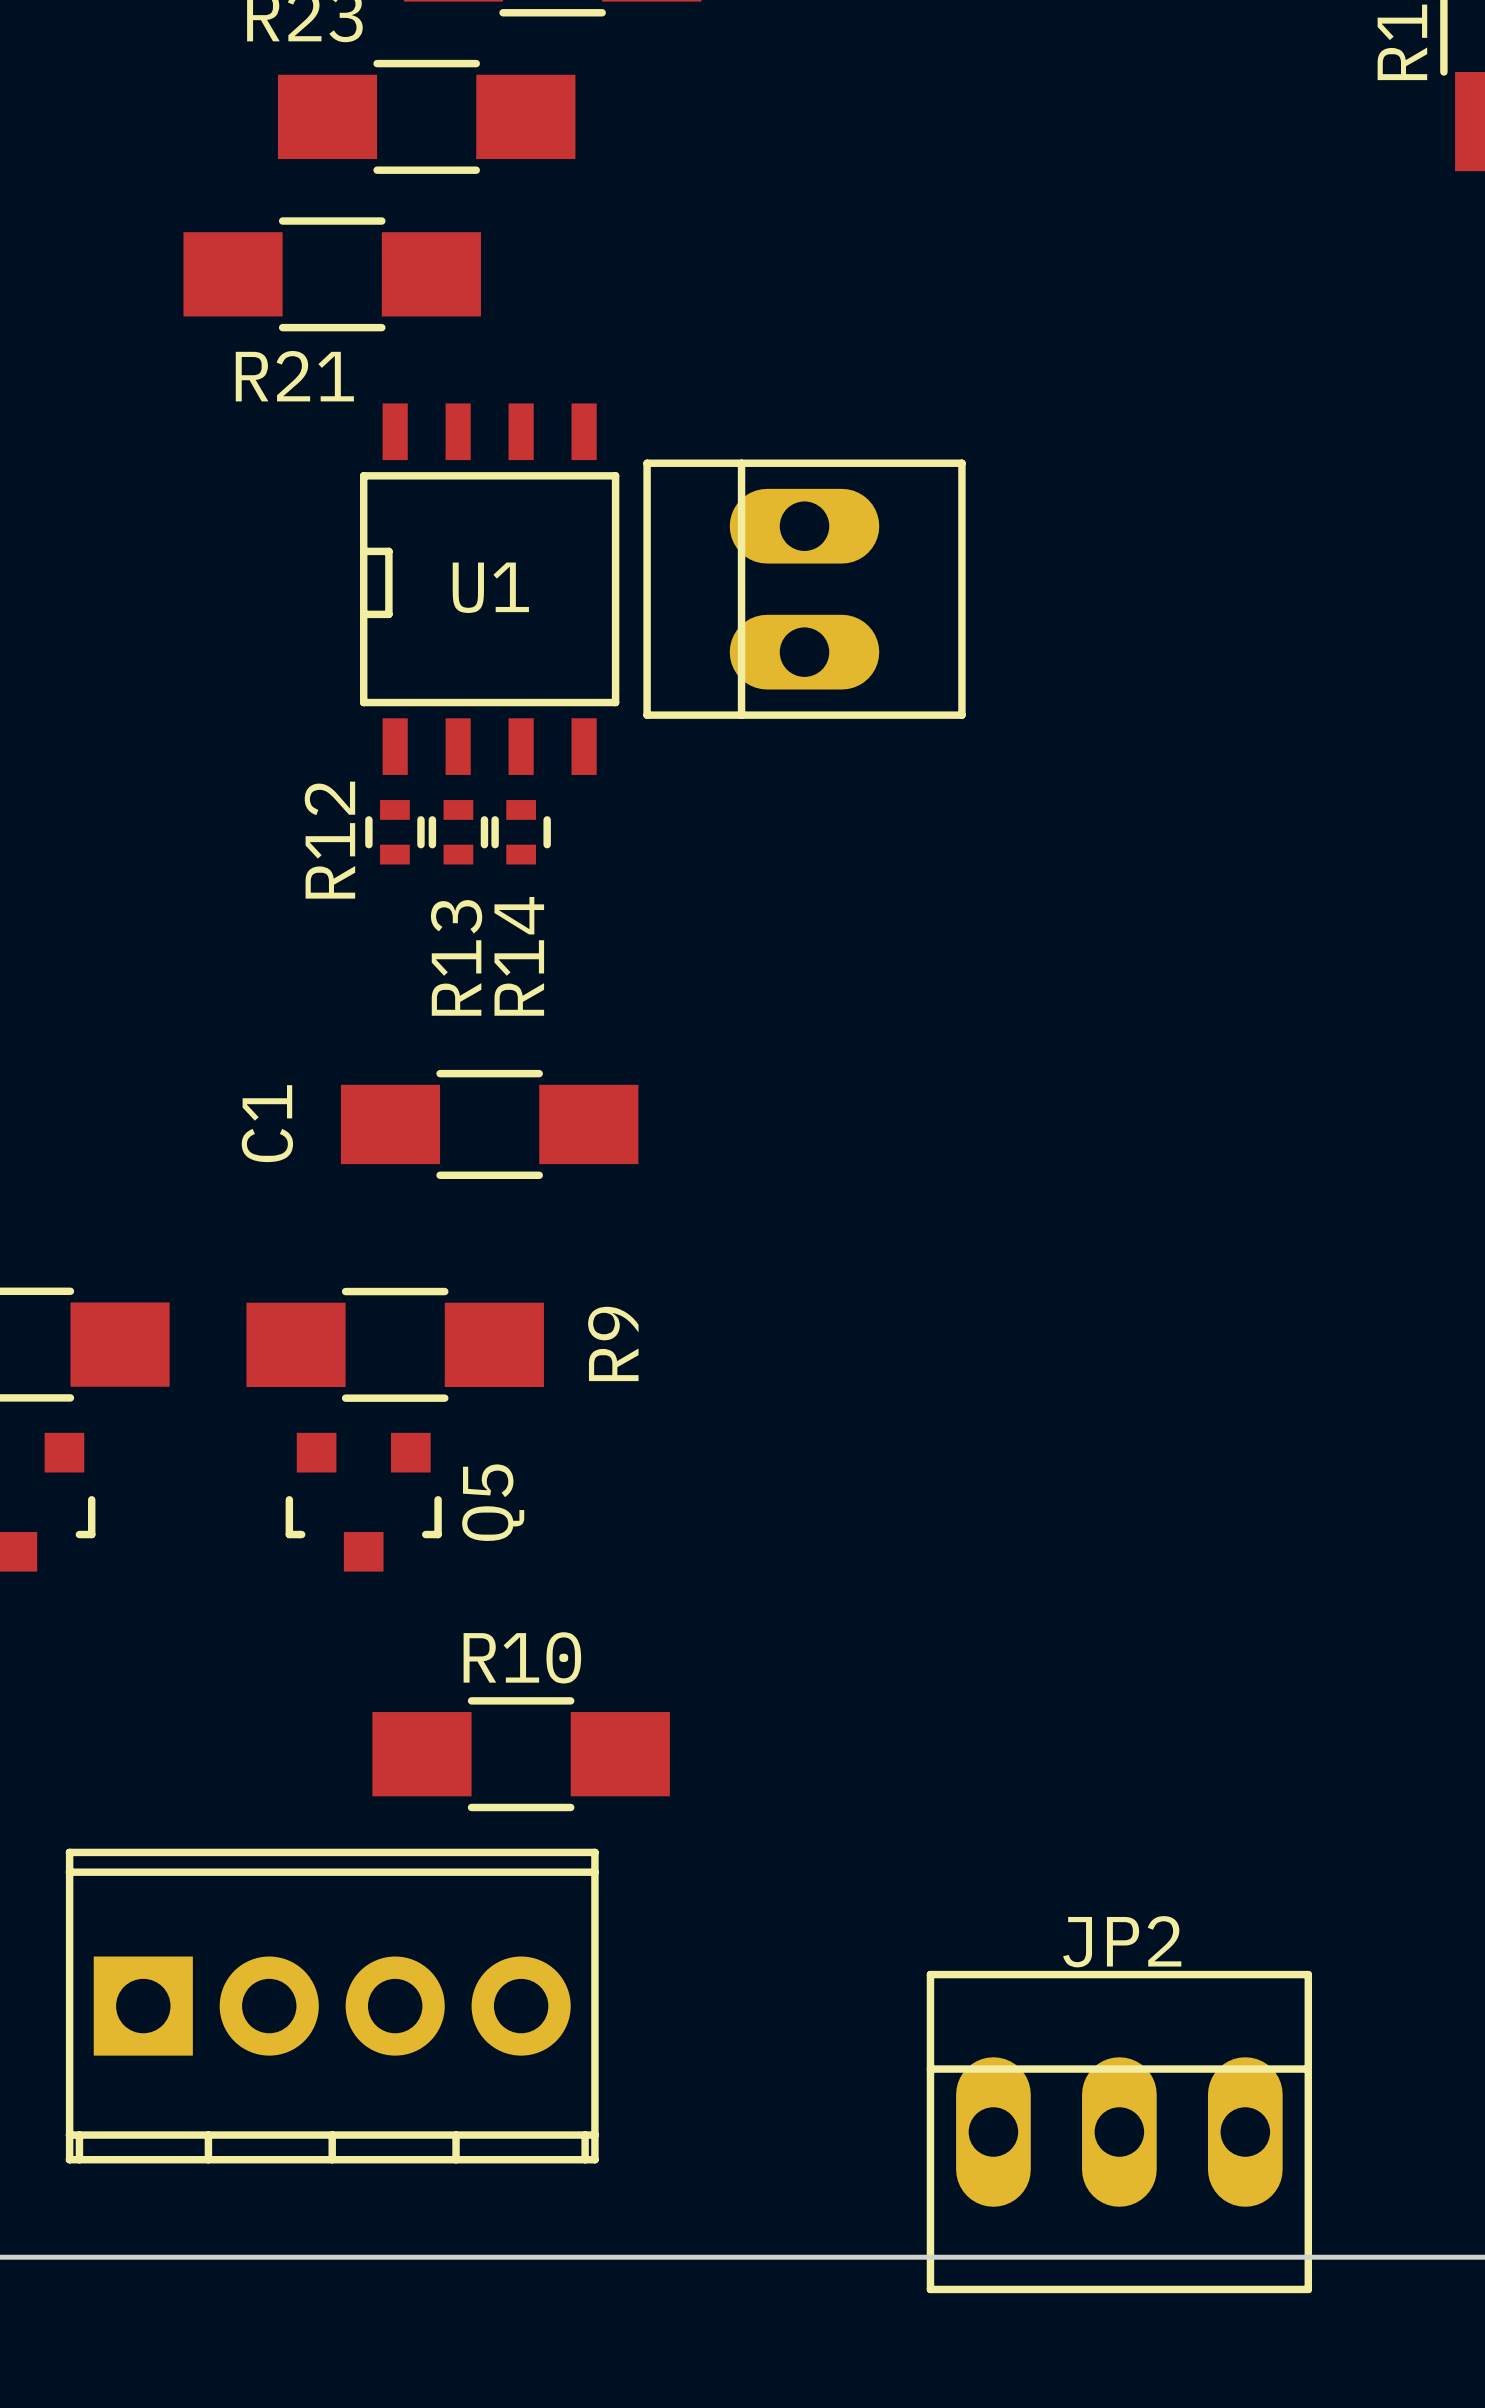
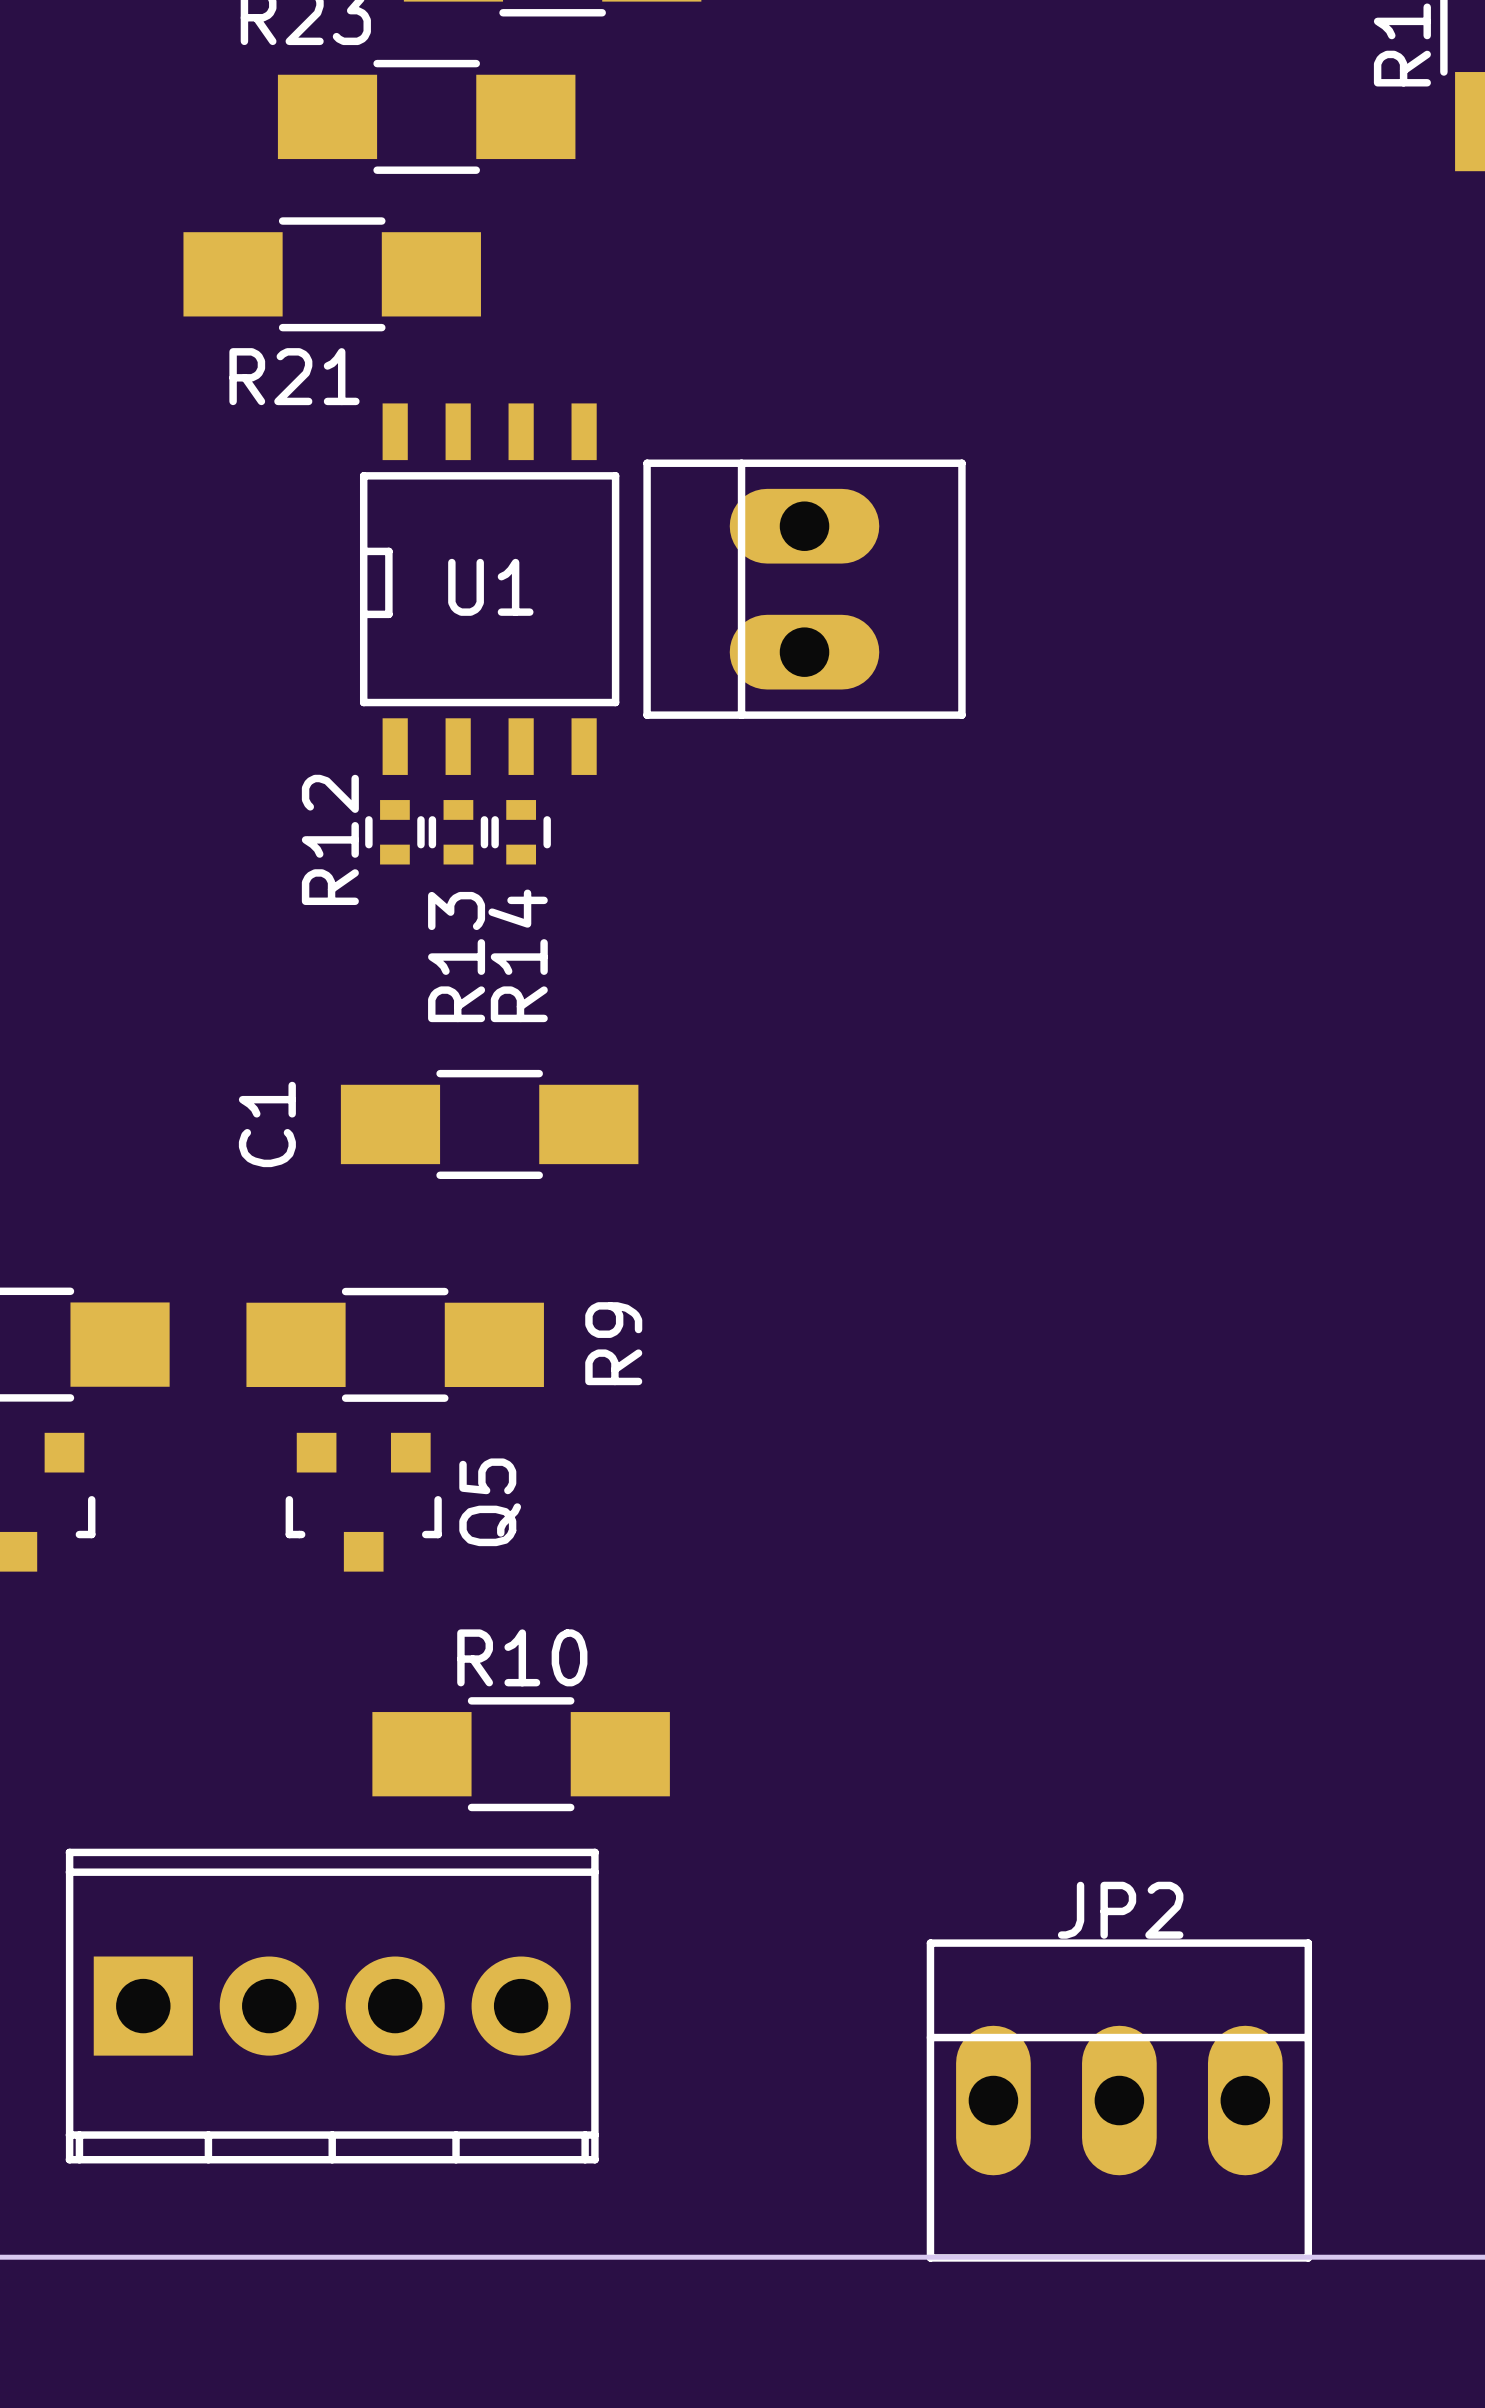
JP2 position: (1119, 2132) -> (1119, 2100)

